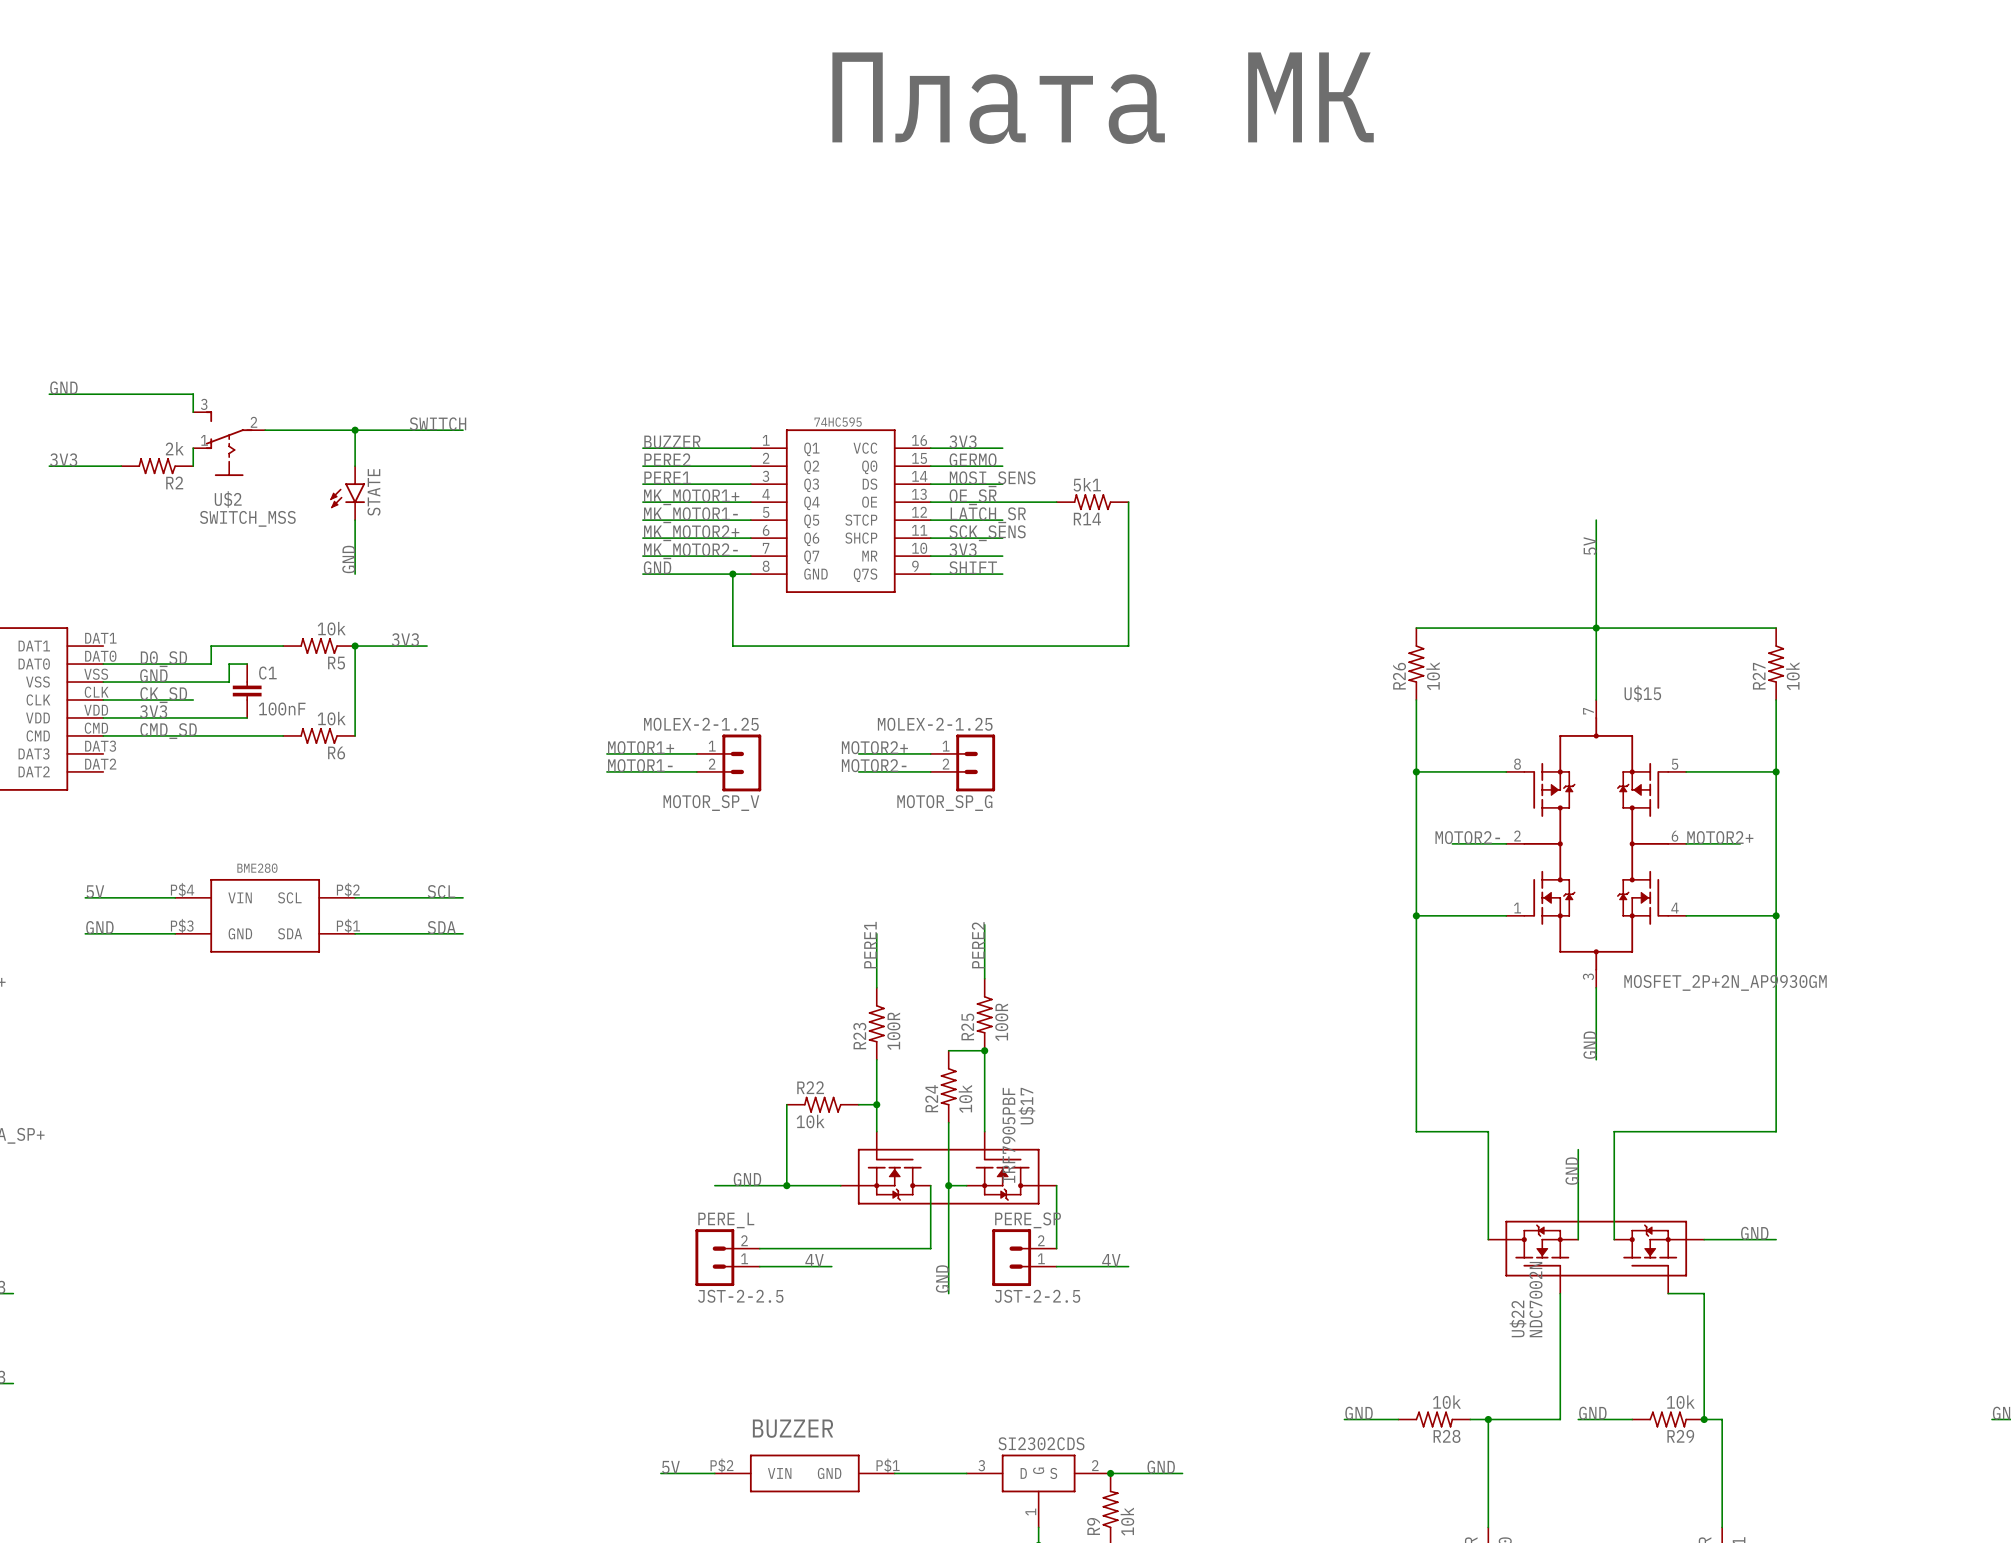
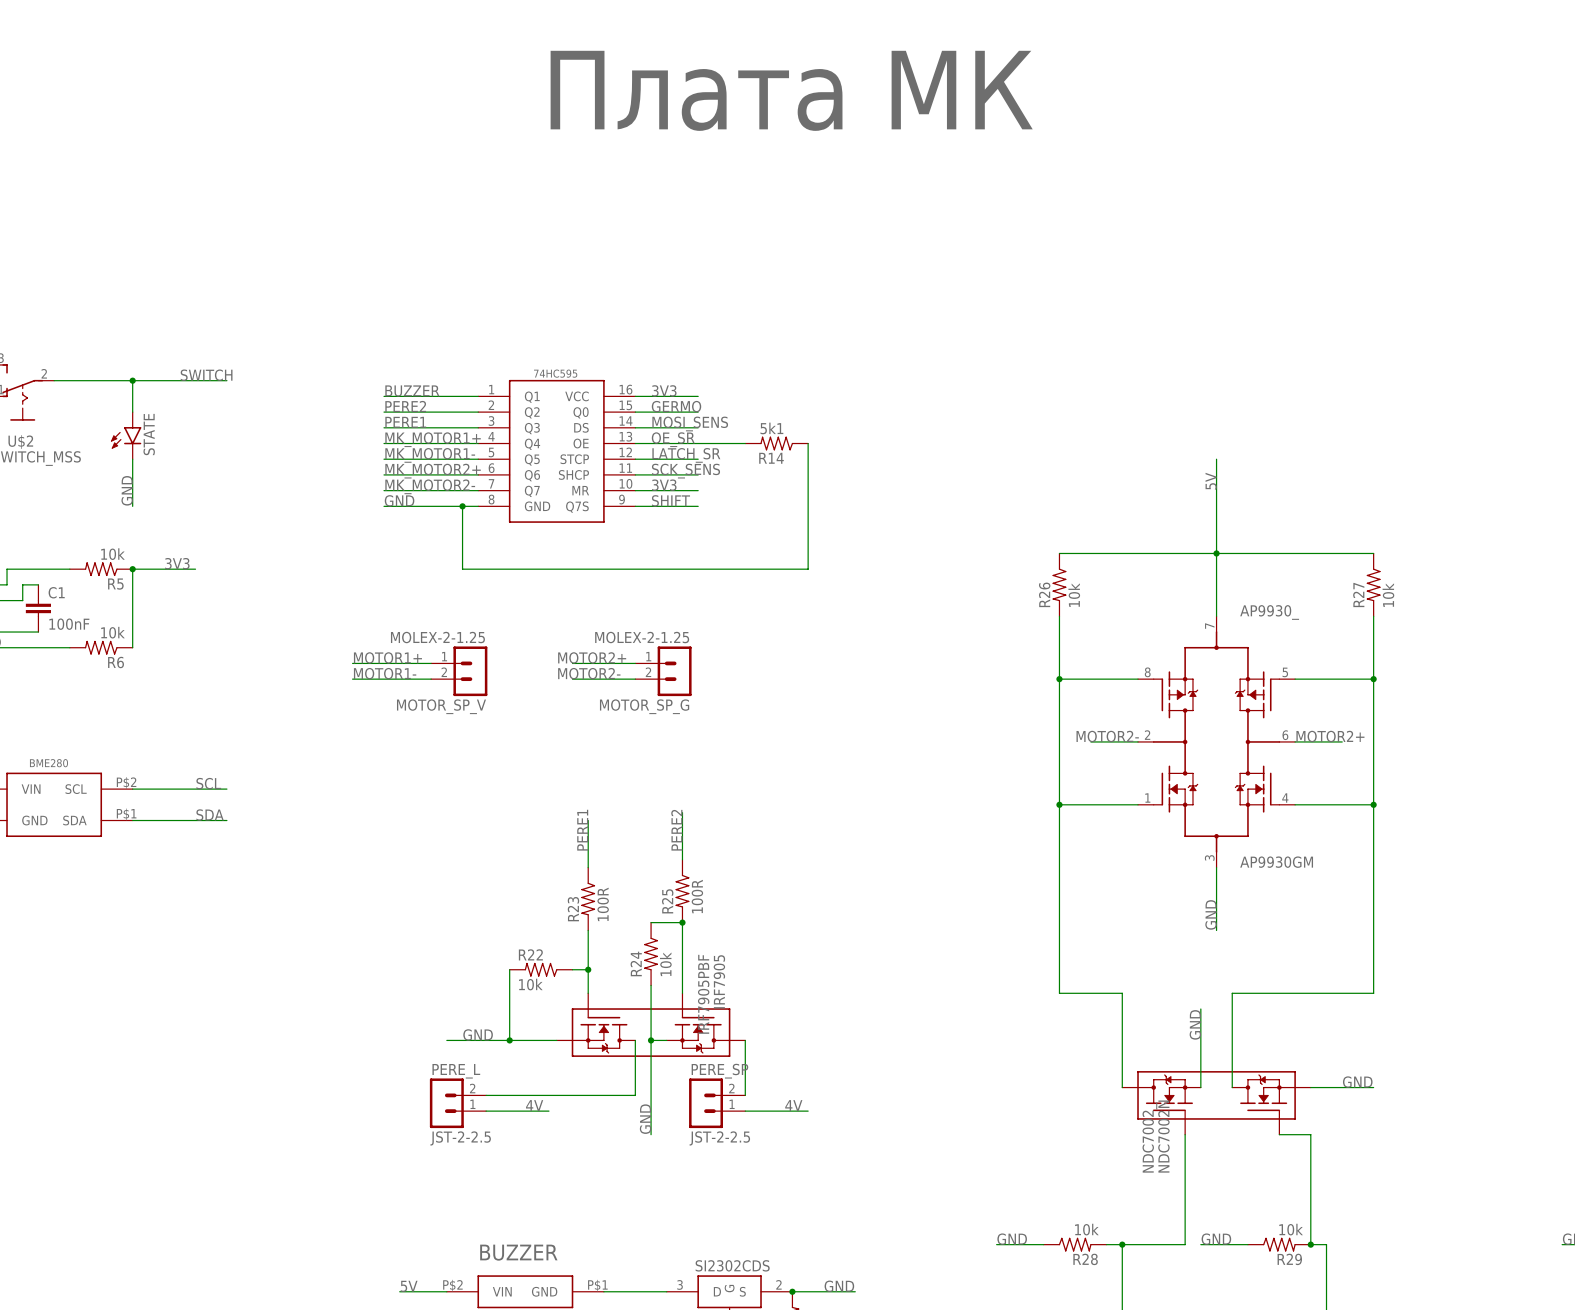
U$15 name: U$15 (1642, 693) -> AP9930_ (1269, 612)
U$15 value: MOSFET_2P+2N_AP9930GM (1725, 982) -> AP9930GM (1276, 862)
U$17 name: U$17 (1026, 1106) -> IRF7905 (719, 981)
U$22 name: U$22 (1518, 1318) -> NDC7002_ (1149, 1137)

